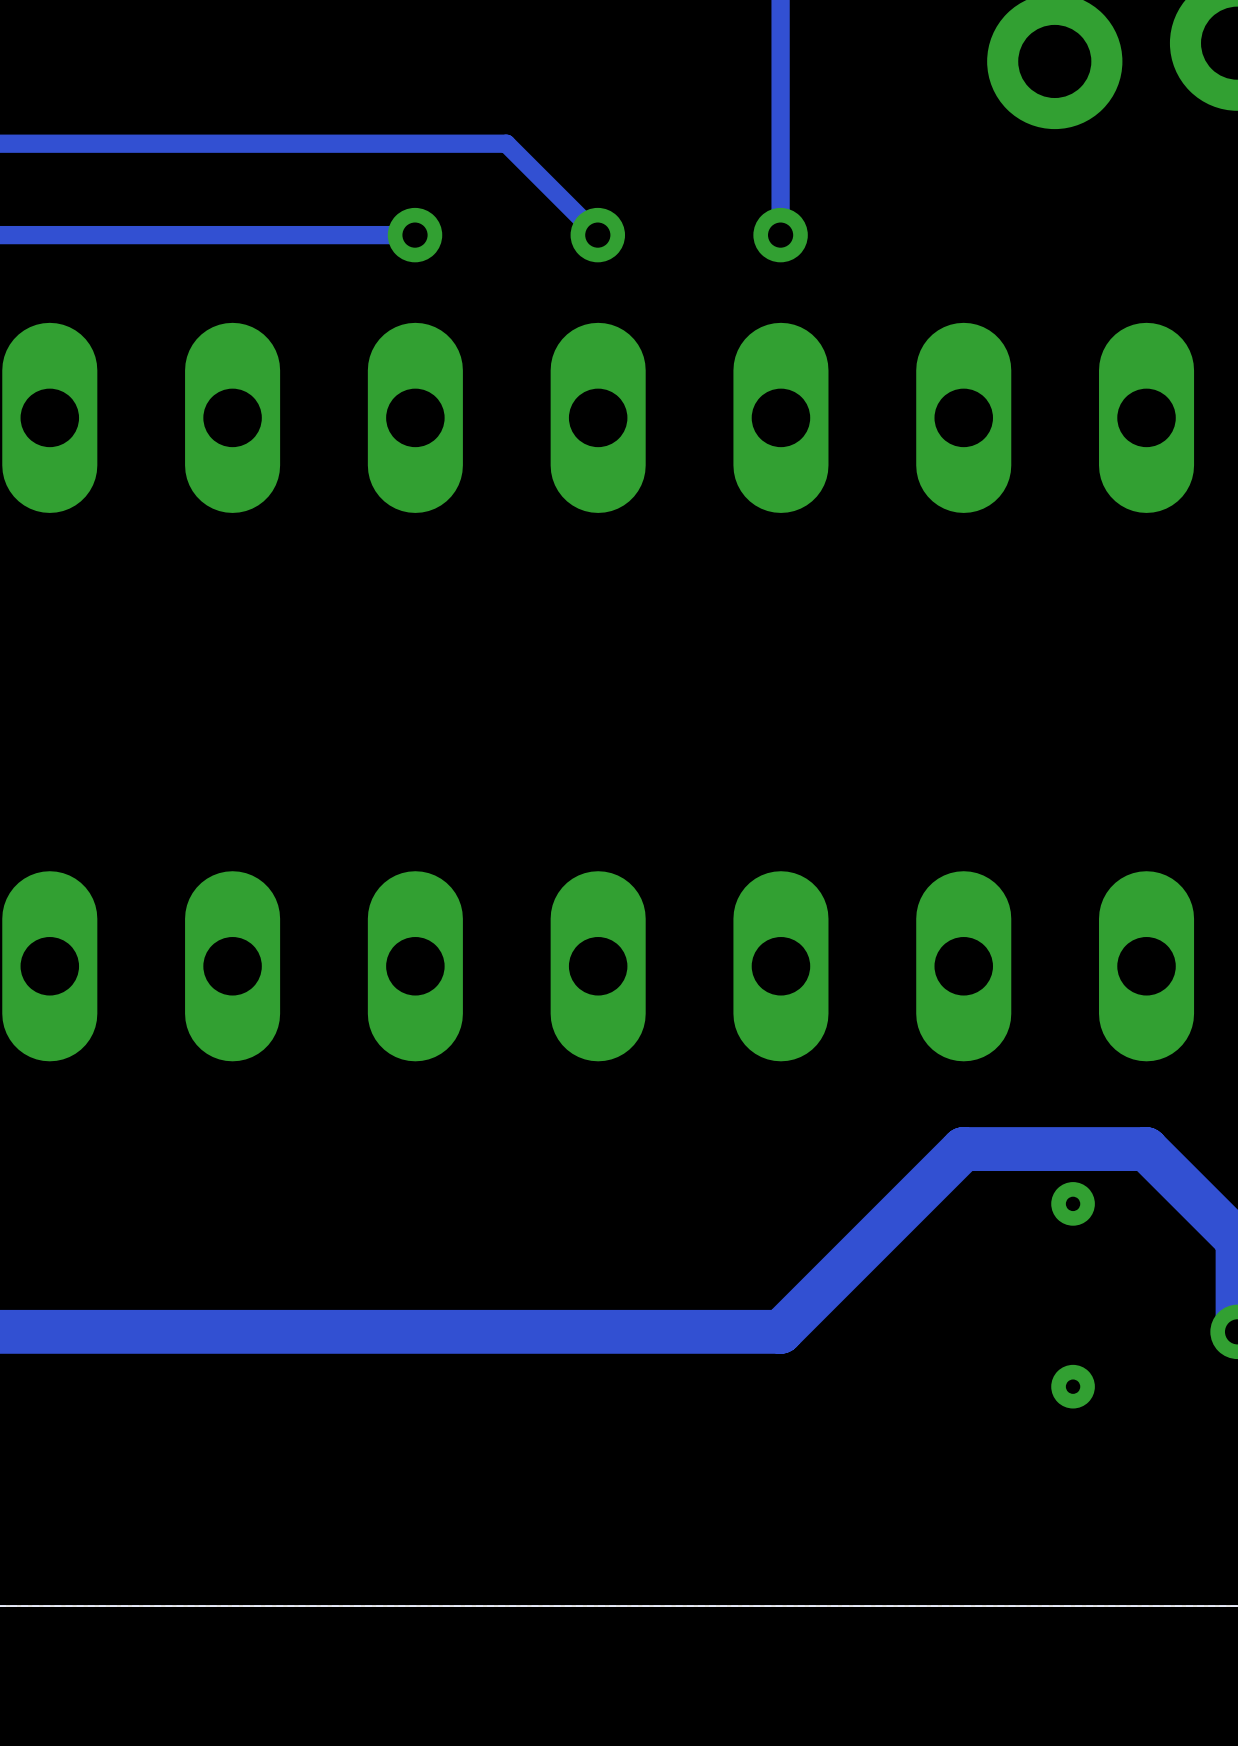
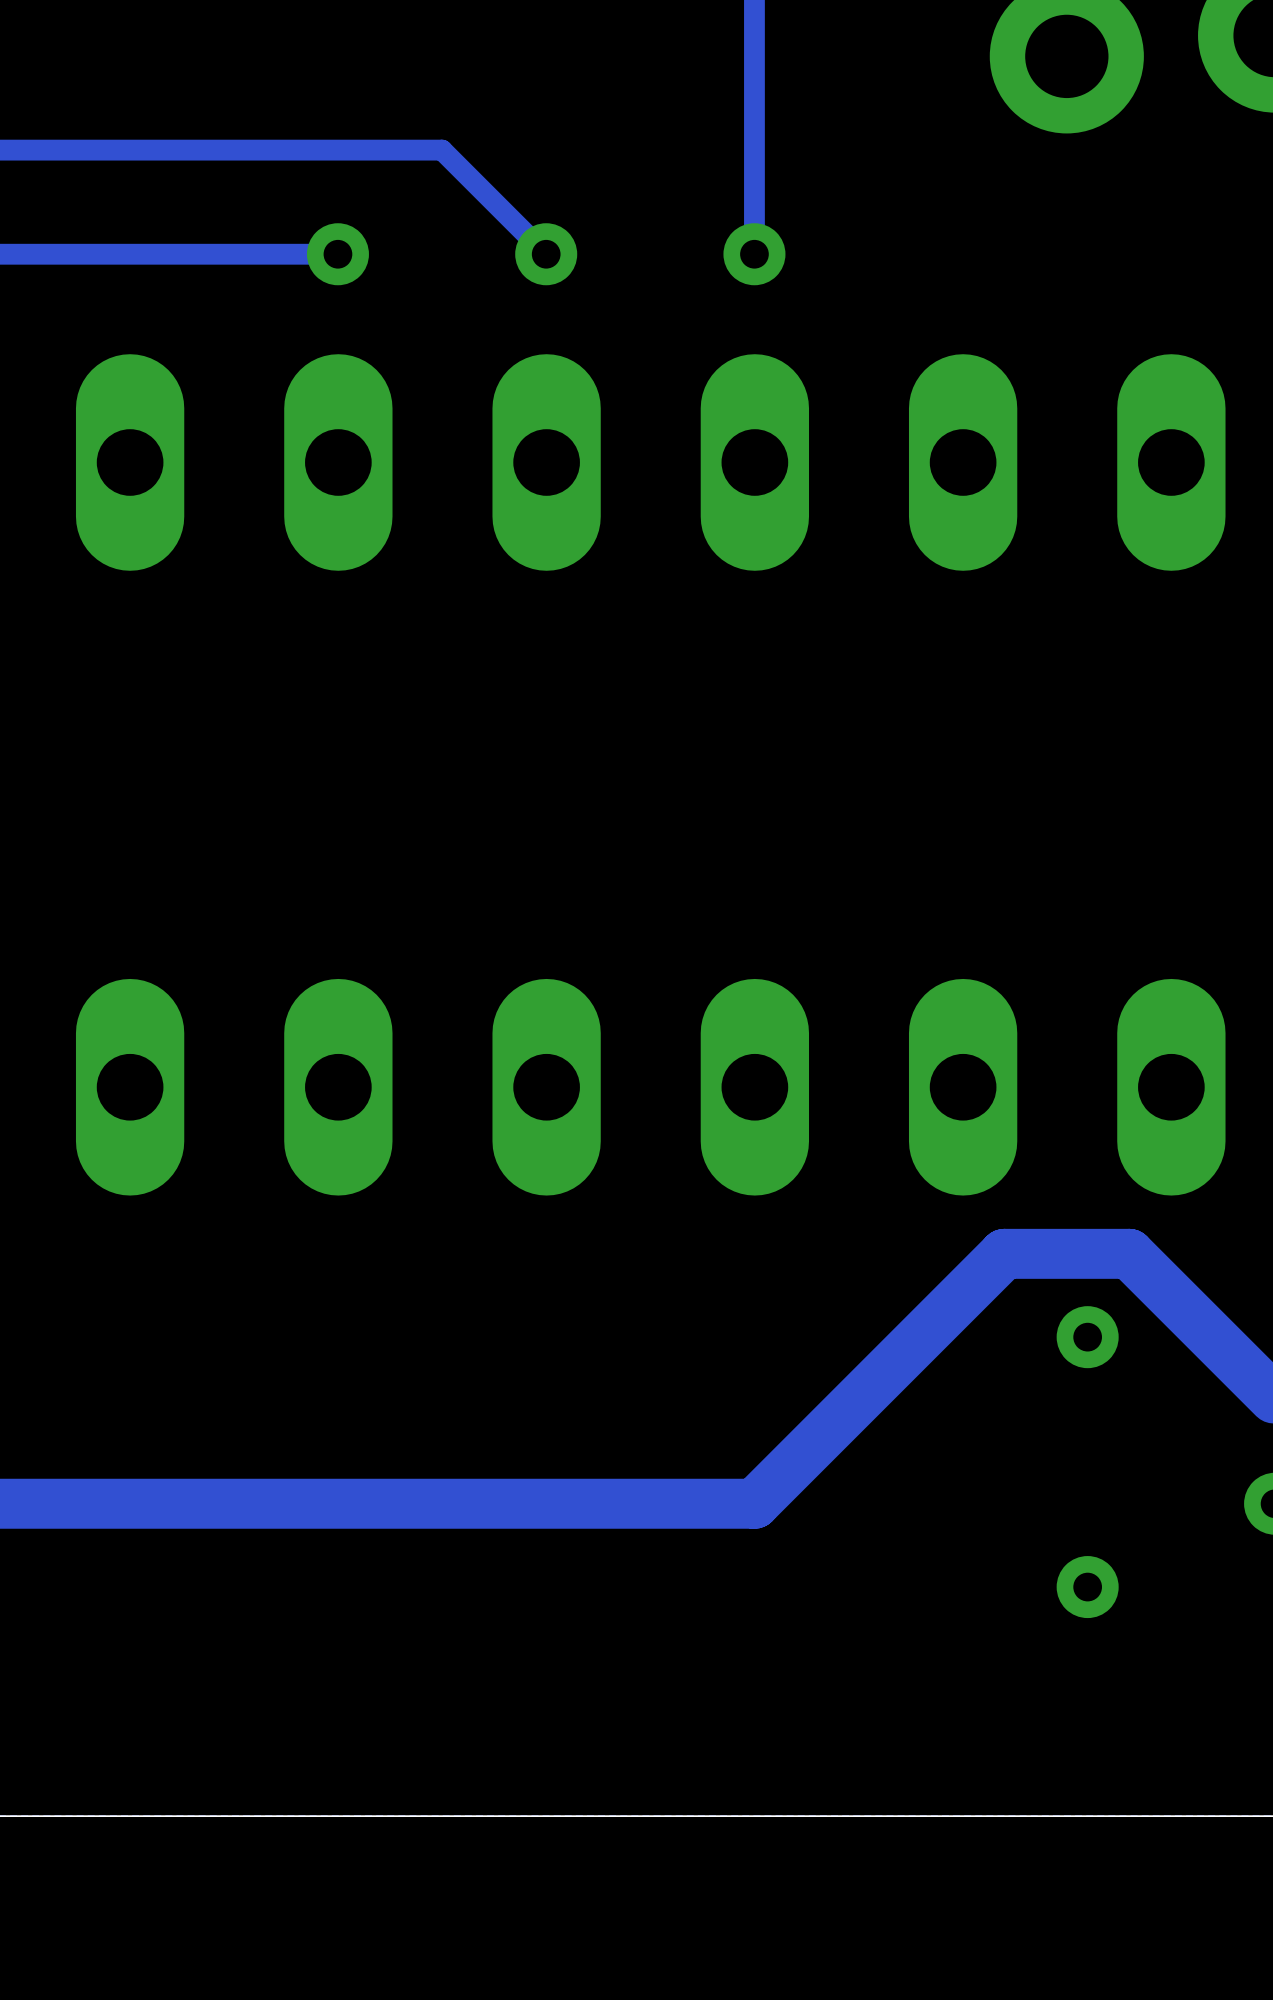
track: (1146, 1149) (963, 1149) -> (1170, 1295) (1129, 1253) (1004, 1253) (962, 1295)
via size: [1051, 1182, 1095, 1226] -> [1056, 1306, 1119, 1369]
via size: [1051, 1364, 1095, 1409] -> [1056, 1556, 1119, 1619]

